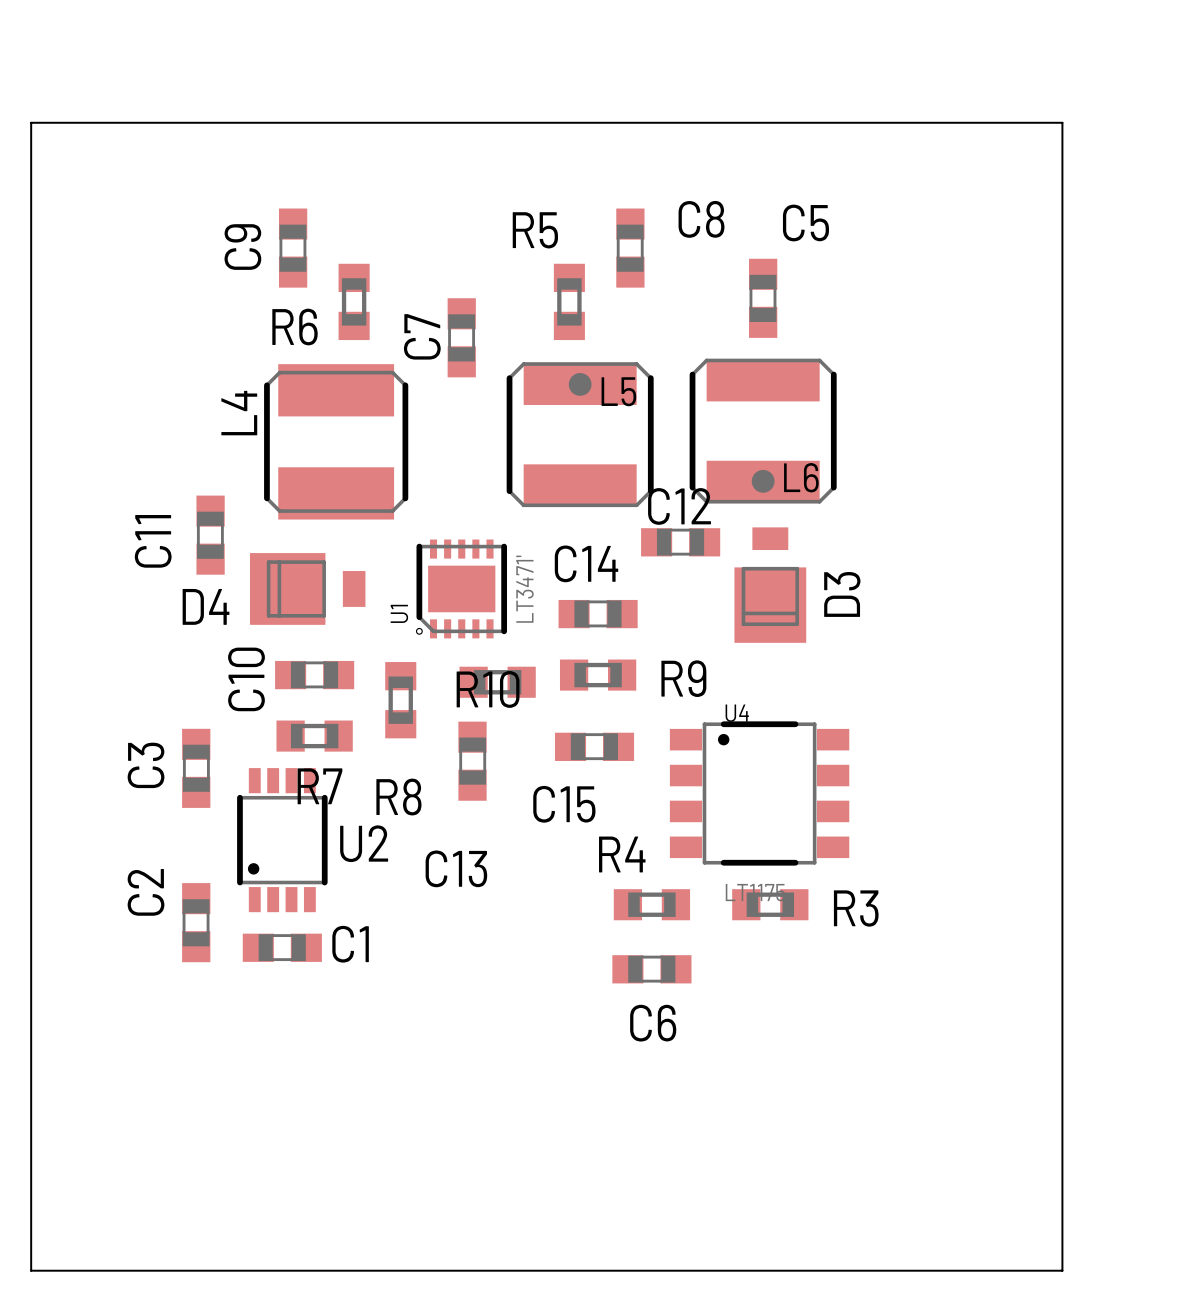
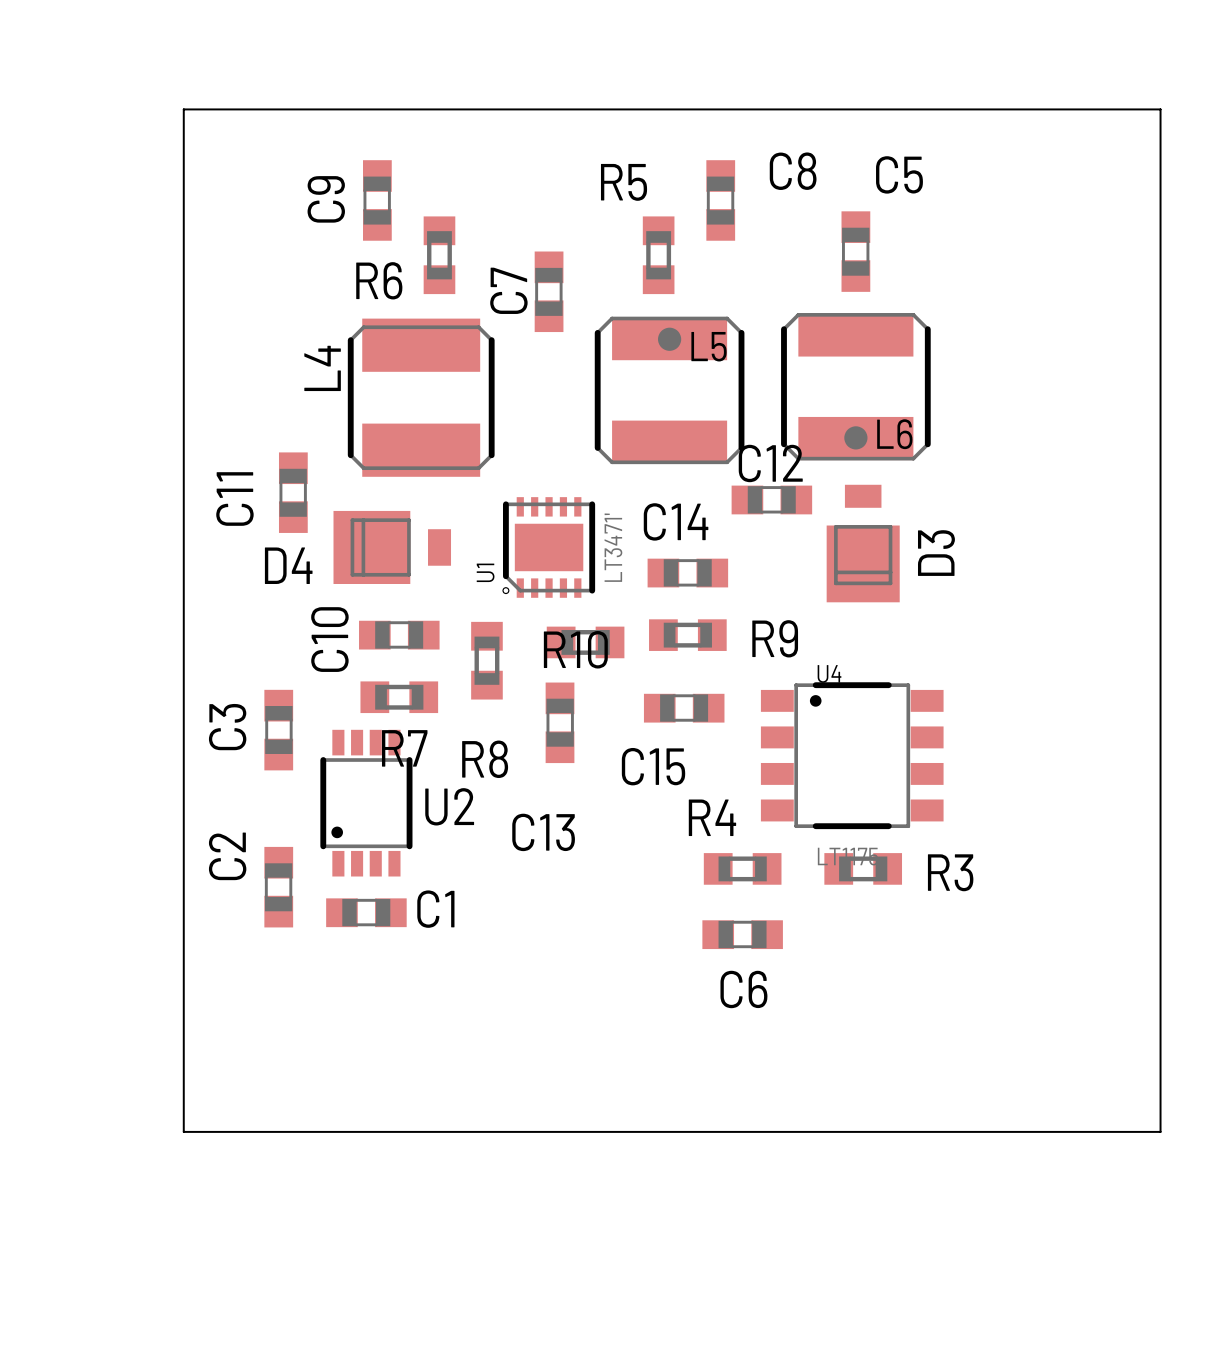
board edge: (1062, 158) (1062, 122) (31, 122) (31, 1270) (1062, 1270) (1062, 1163) -> (1160, 109) (183, 109) (183, 1131) (1160, 1131)

